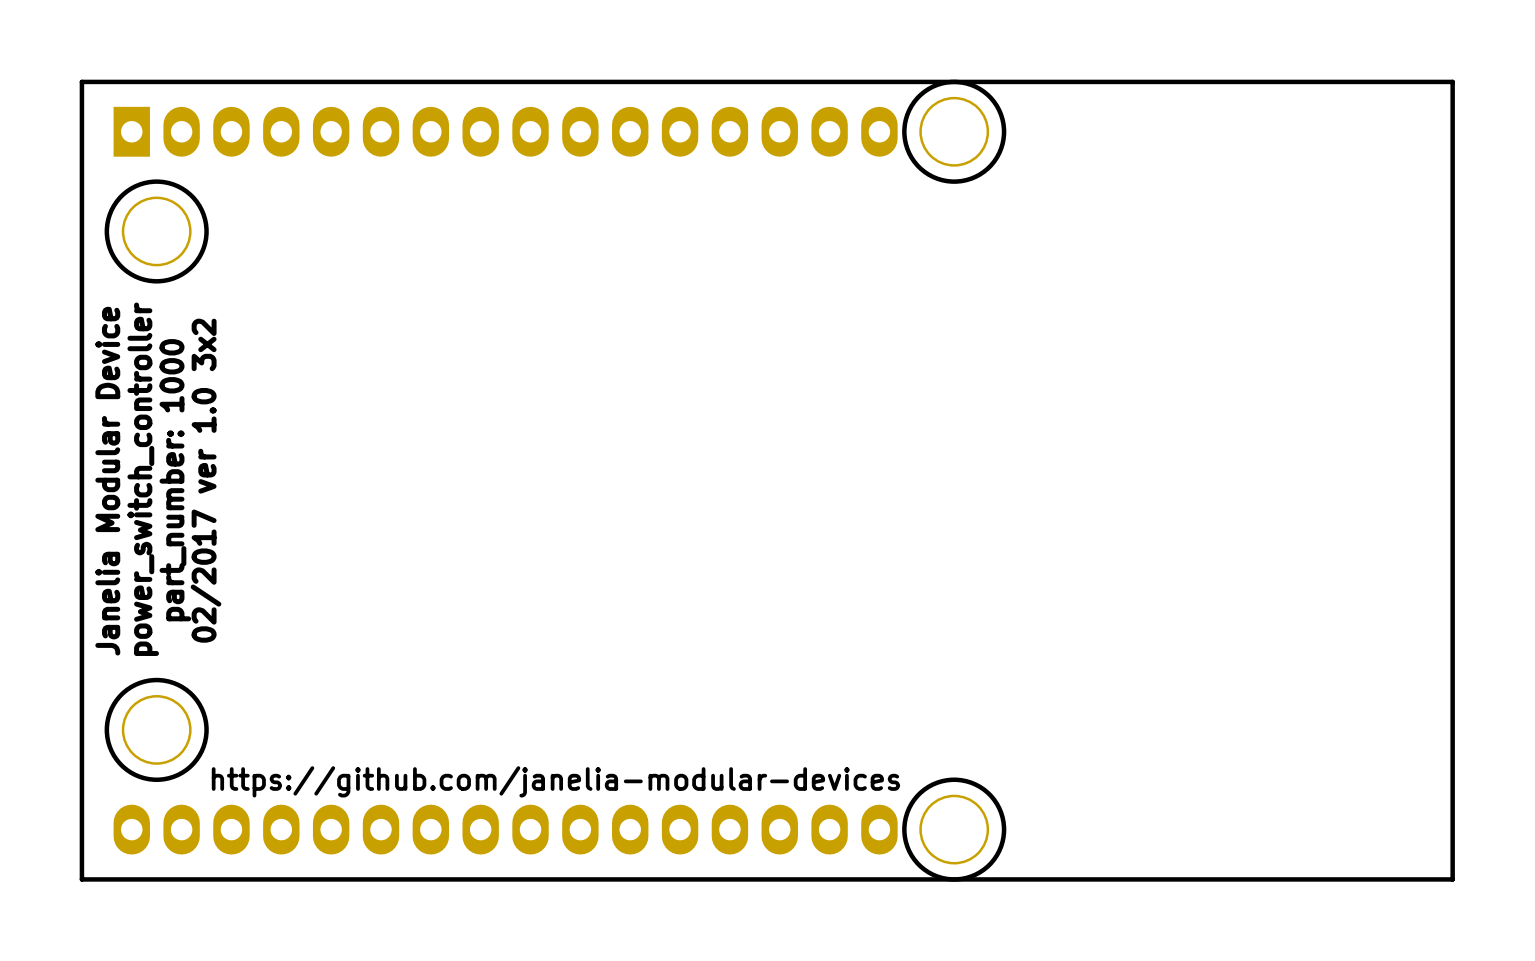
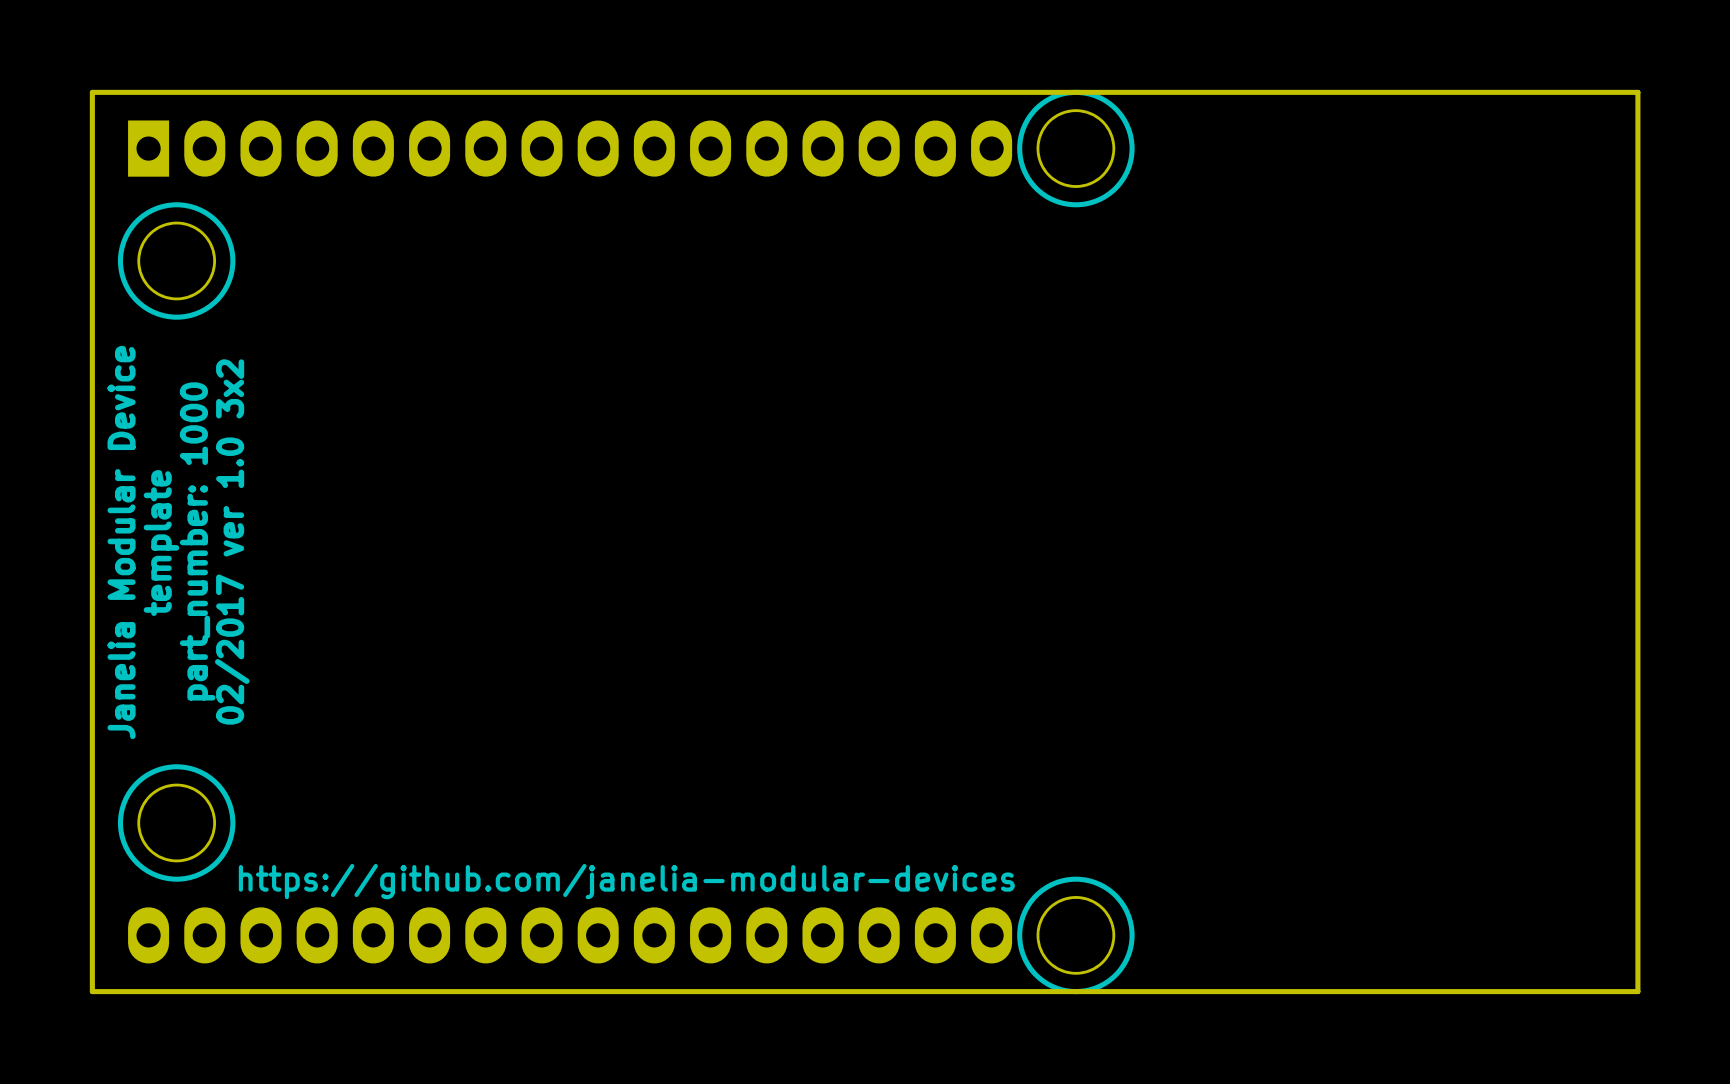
text: power_switch_controller (143, 479) -> template (161, 543)

